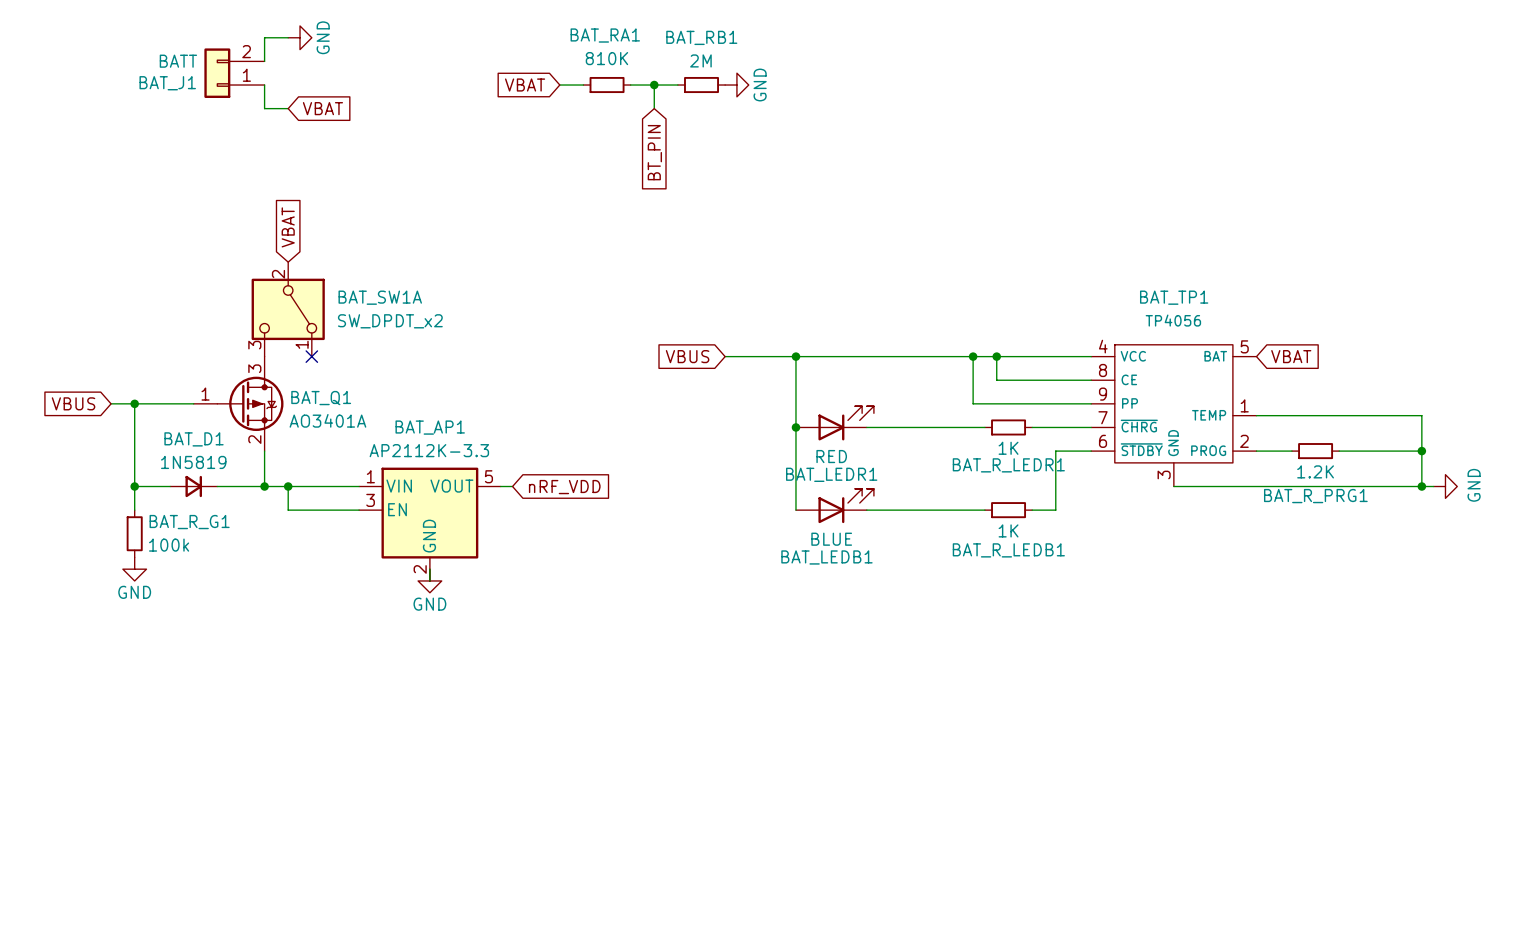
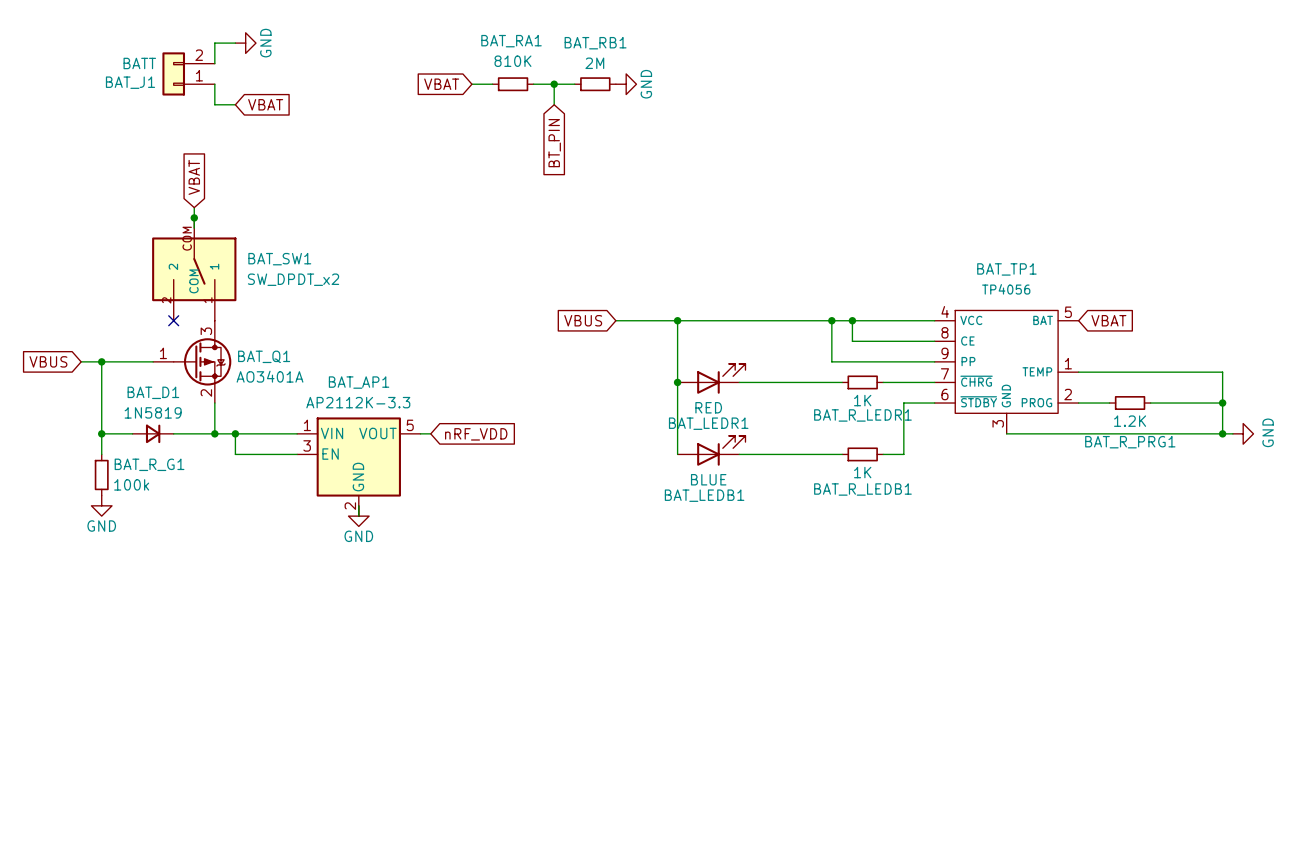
wire: none -> (194, 207) (194, 228)
global label position: VBAT (288, 227) -> VBAT (194, 177)
junction: none -> (194, 217)
BAT_SW1: none -> SW_DPDT_x2 (194, 269)
BAT_SW1A: SW_DPDT_x2 (288, 309) -> none
no-connect mark: none -> (173, 320)
no-connect mark: (311, 356) -> none

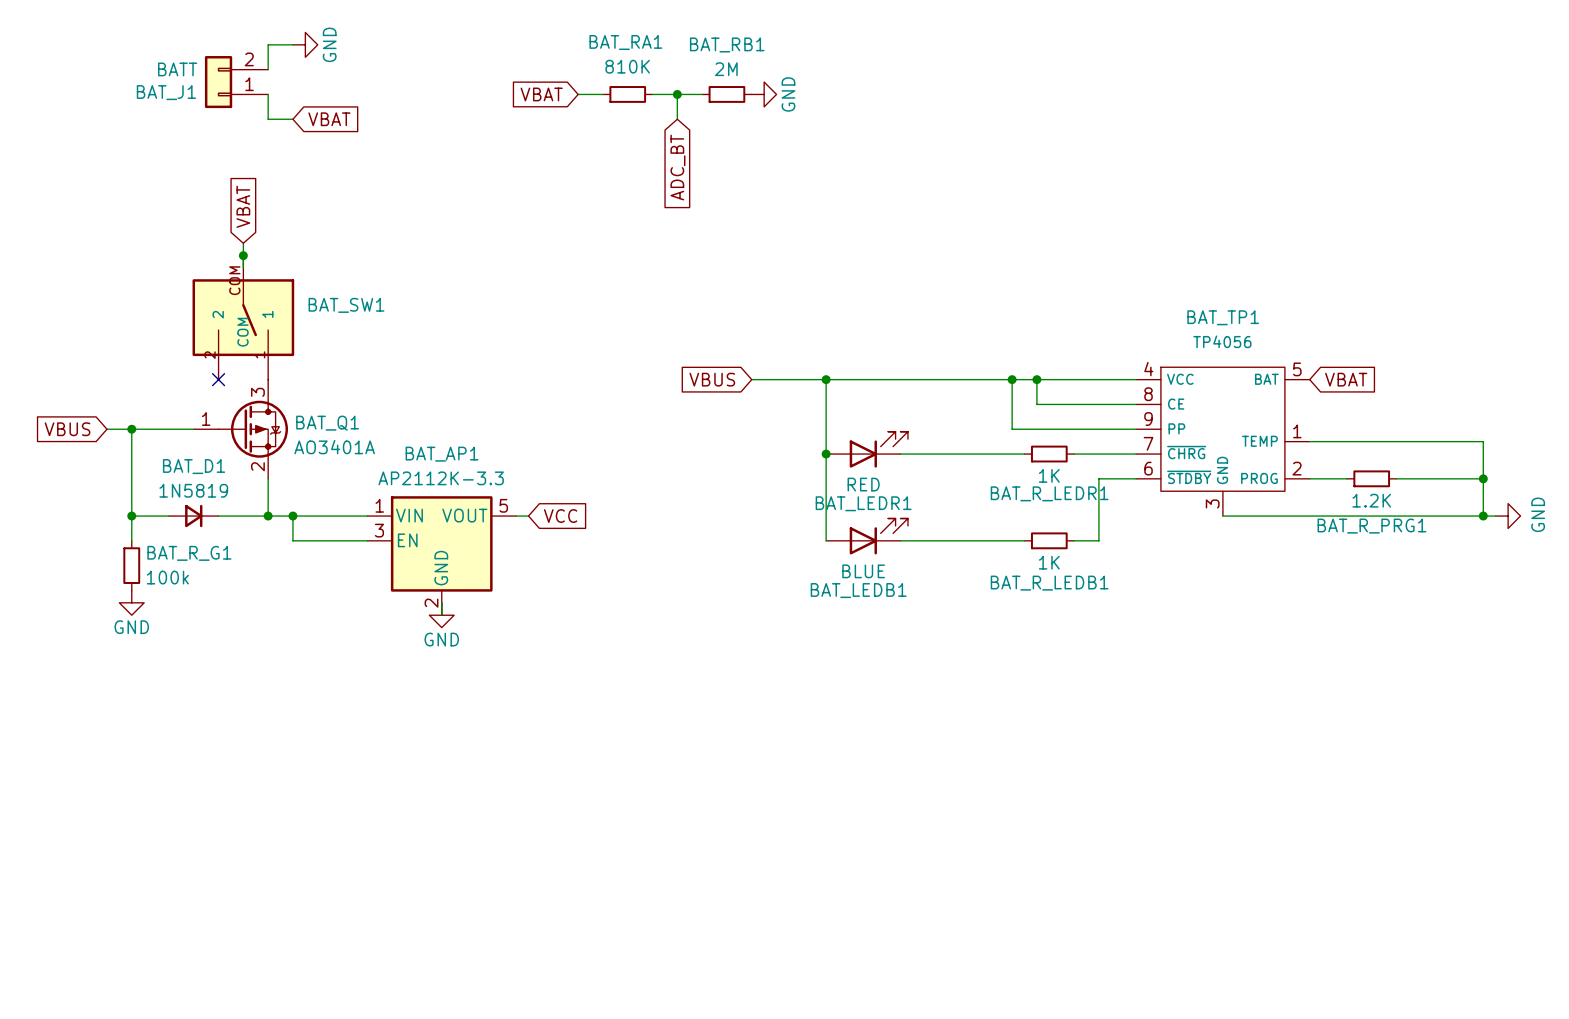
global label: BT_PIN (554, 143) -> ADC_BT (677, 167)
BAT_SW1 value: SW_DPDT_x2 (293, 279) -> none
global label: nRF_VDD (476, 434) -> VCC (560, 516)

